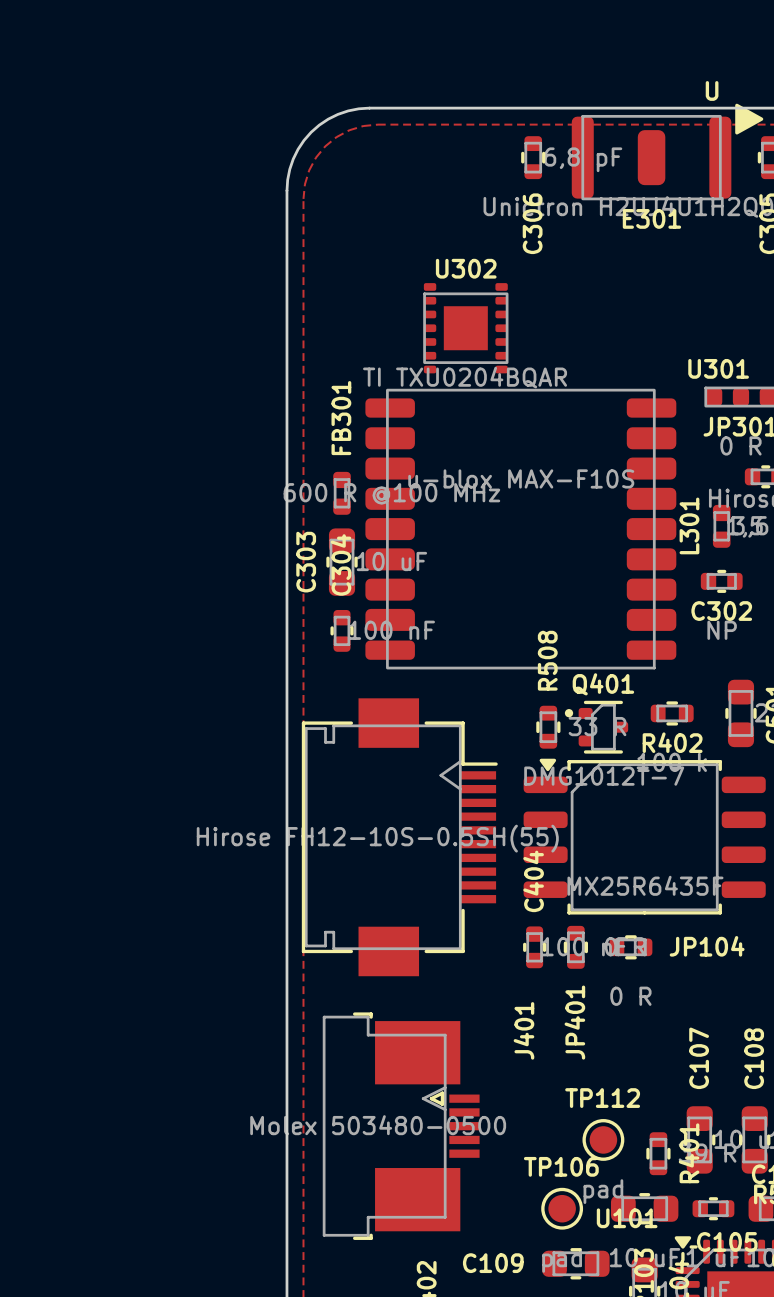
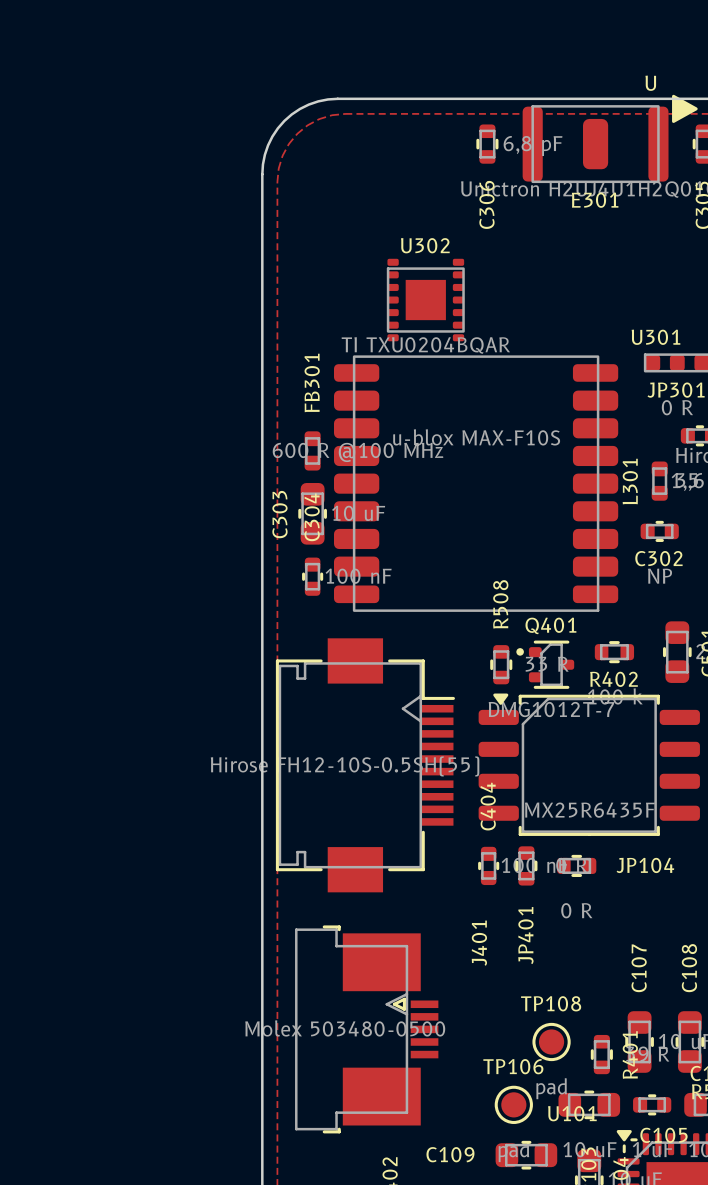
TP112 name: TP112 (602, 1098) -> TP108 (551, 1003)

